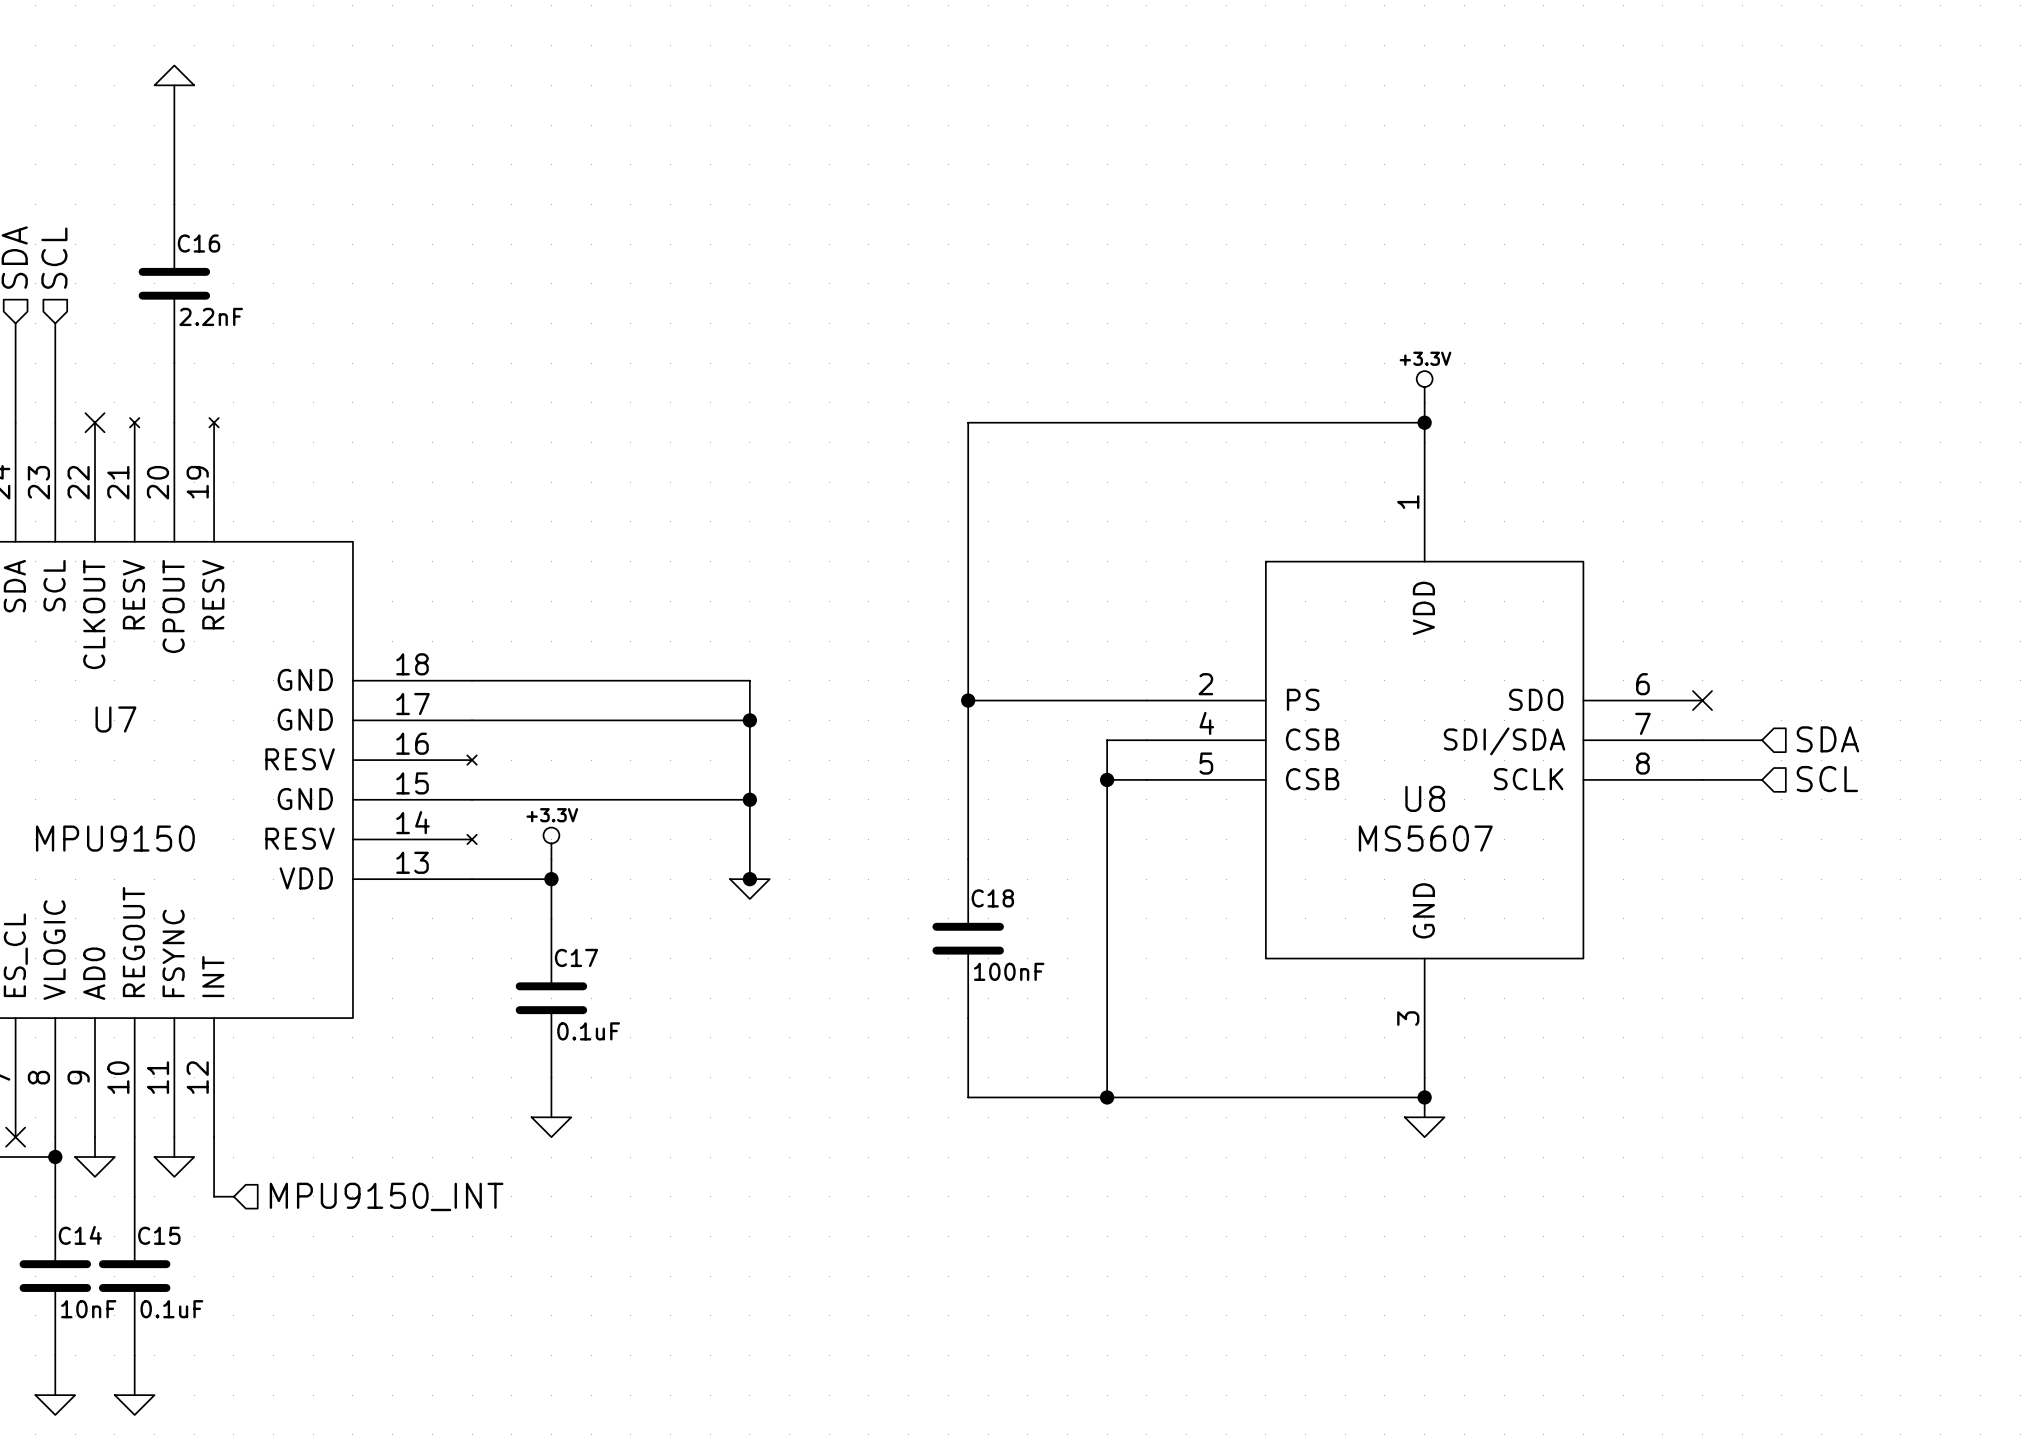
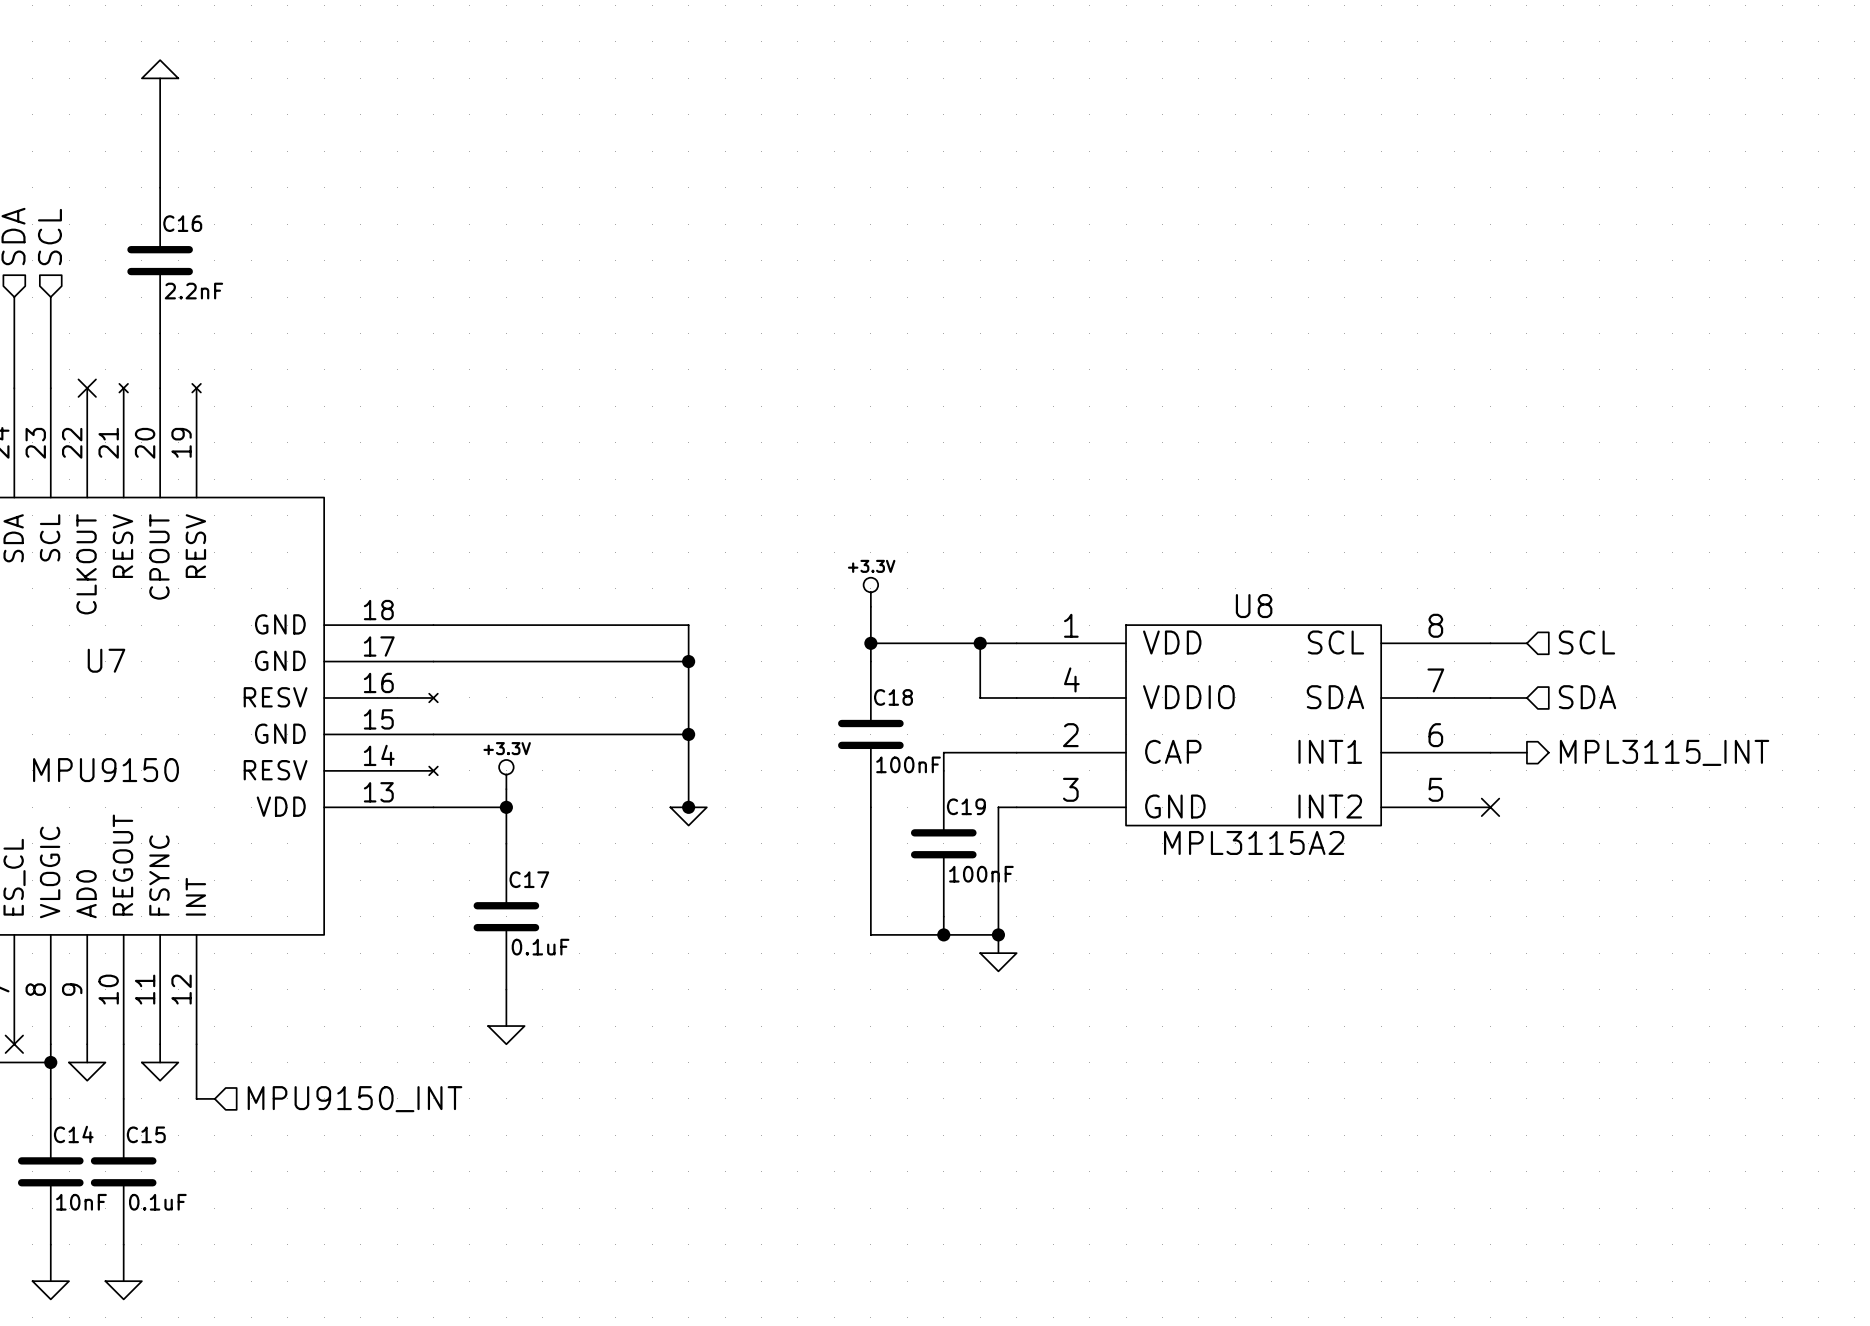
power symbol: +3.3V (1424, 386) -> none
wire: (1424, 402) (1424, 442) -> none
wire: (1424, 422) (968, 422) (968, 859) -> none
junction: (1424, 422) -> none
U8 symbol: [1146, 442, 1703, 1078] -> [1016, 625, 1491, 826]
power symbol: none -> +3.3V (870, 592)
wire: none -> (870, 606) (870, 661)
wire: none -> (870, 643) (889, 643)
junction position: (968, 700) -> (870, 643)
wire: none -> (980, 643) (980, 697) (1016, 697)
junction: none -> (980, 643)
no-connect mark: (1702, 700) -> none
hierarchical label position: SDA (1827, 739) -> SDA (1587, 697)
wire: (1146, 740) (1107, 740) (1107, 1097) -> none
wire: (1702, 740) (1762, 740) -> none
wire: none -> (1490, 697) (1526, 697)
wire: (1107, 779) (1146, 779) -> none
junction: (1107, 779) -> none
wire: (1702, 779) (1762, 779) -> none
hierarchical label position: SCL (1827, 779) -> SCL (1586, 642)
U8 name position: U8 (1425, 798) -> U8 (1254, 606)
wire: none -> (1016, 752) (943, 752) (943, 770)
wire: none -> (1490, 752) (1526, 752)
hierarchical label: none -> MPL3115_INT (1664, 752)
U8 value: MS5607 (1425, 838) -> MPL3115A2 (1254, 842)
wire: none -> (870, 807) (870, 934) (998, 934)
wire: none -> (1016, 807) (998, 807) (998, 953)
no-connect mark: none -> (1490, 807)
C19: none -> 100nF (943, 843)
C18 position: (968, 938) -> (870, 734)
wire: none -> (943, 916) (943, 934)
wire: (968, 1018) (968, 1097) (1424, 1097) -> none
junction: none -> (943, 934)
junction: none -> (998, 934)
wire: (1424, 1077) (1424, 1117) -> none
junction: (1107, 1097) -> none
junction: (1424, 1097) -> none
power symbol position: (1424, 1127) -> (998, 962)

